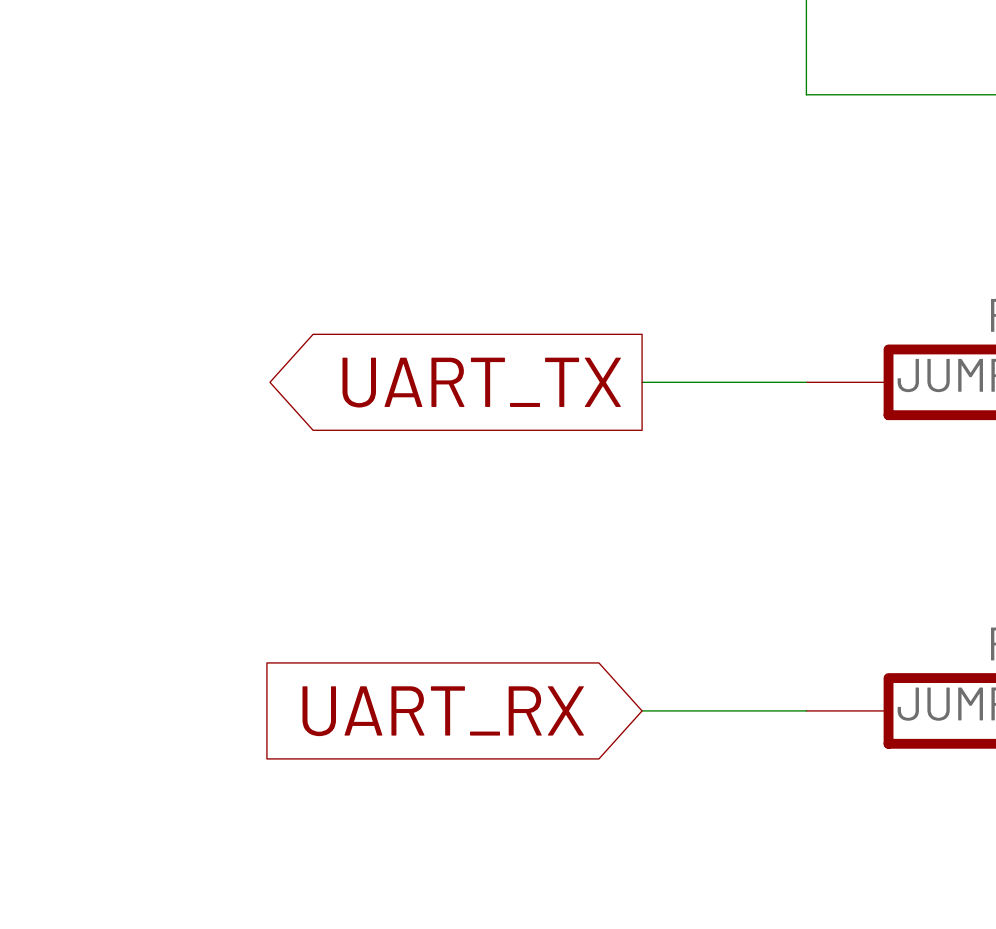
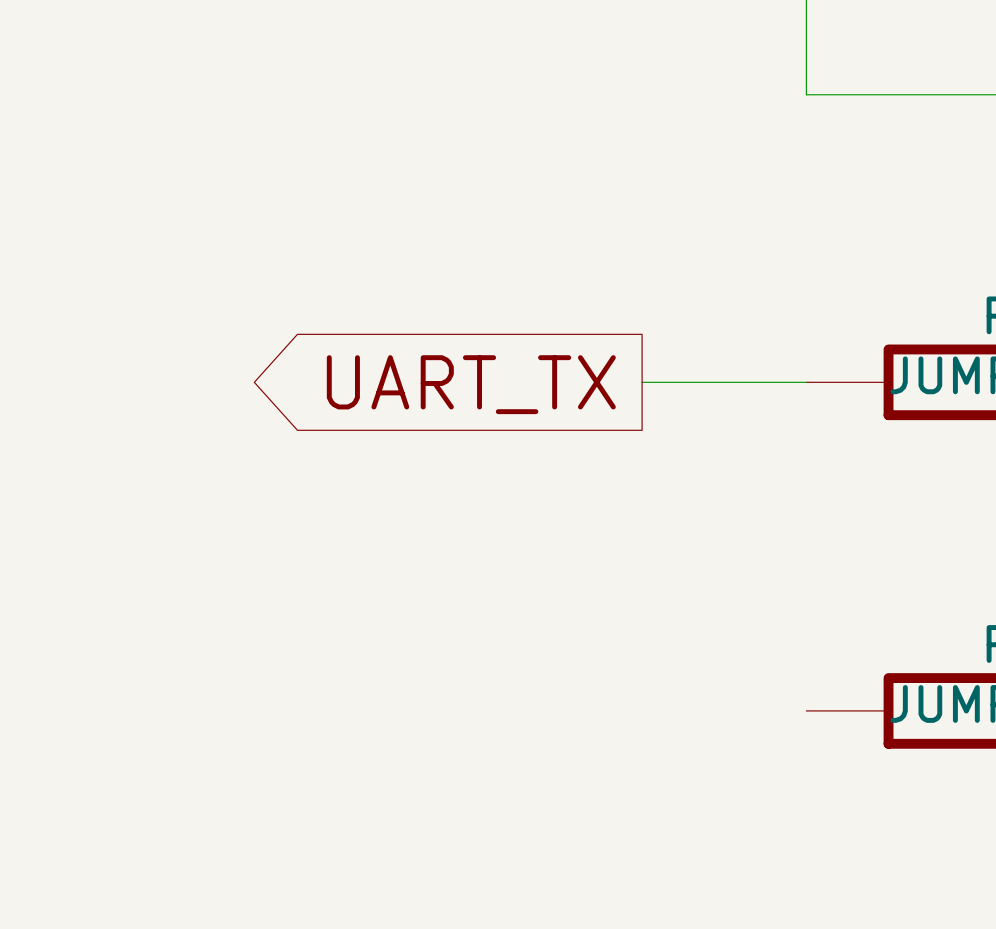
wire: (642, 710) (806, 710) -> none
global label: UART_RX (443, 711) -> none

